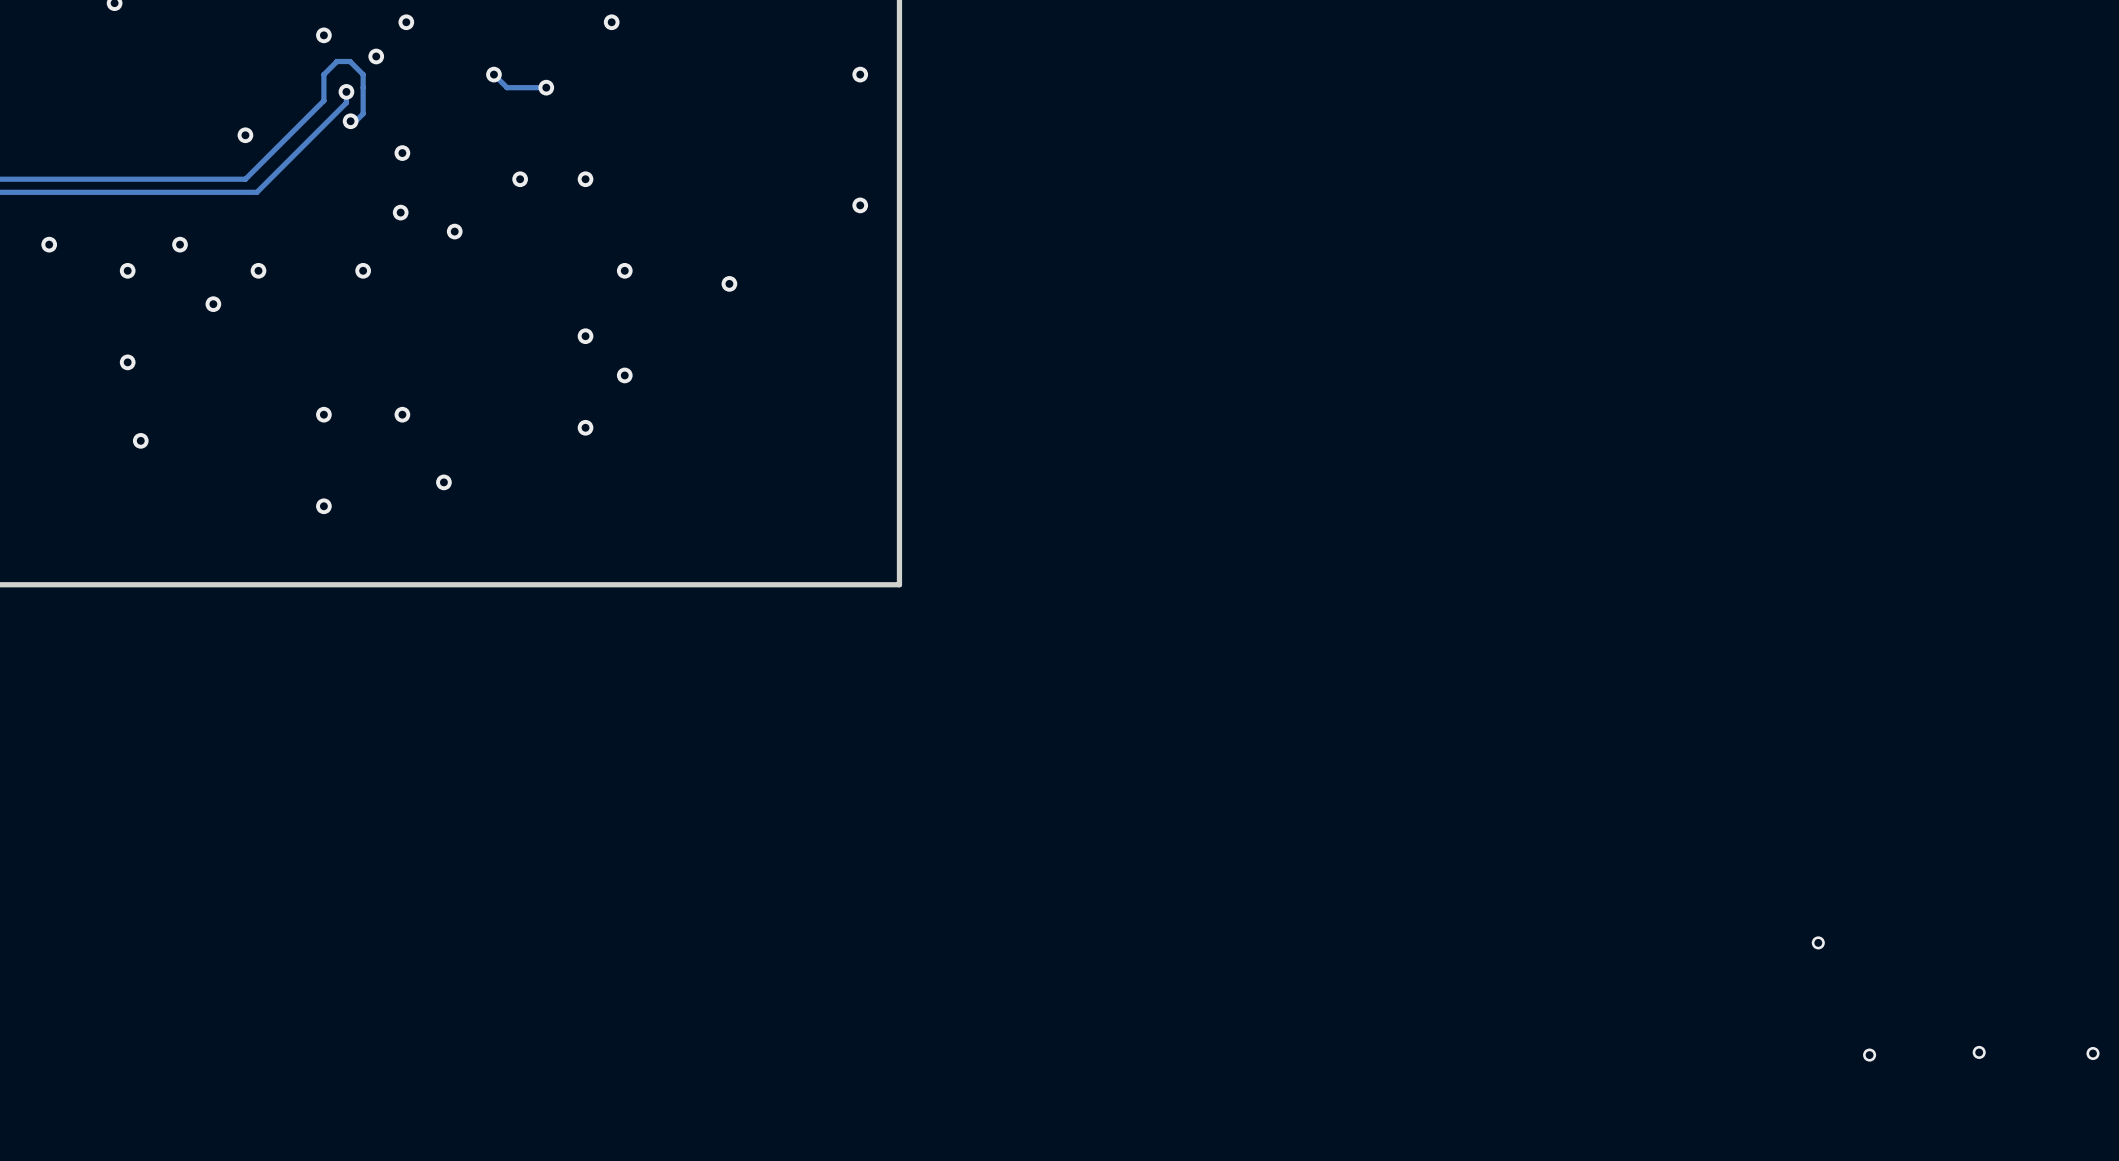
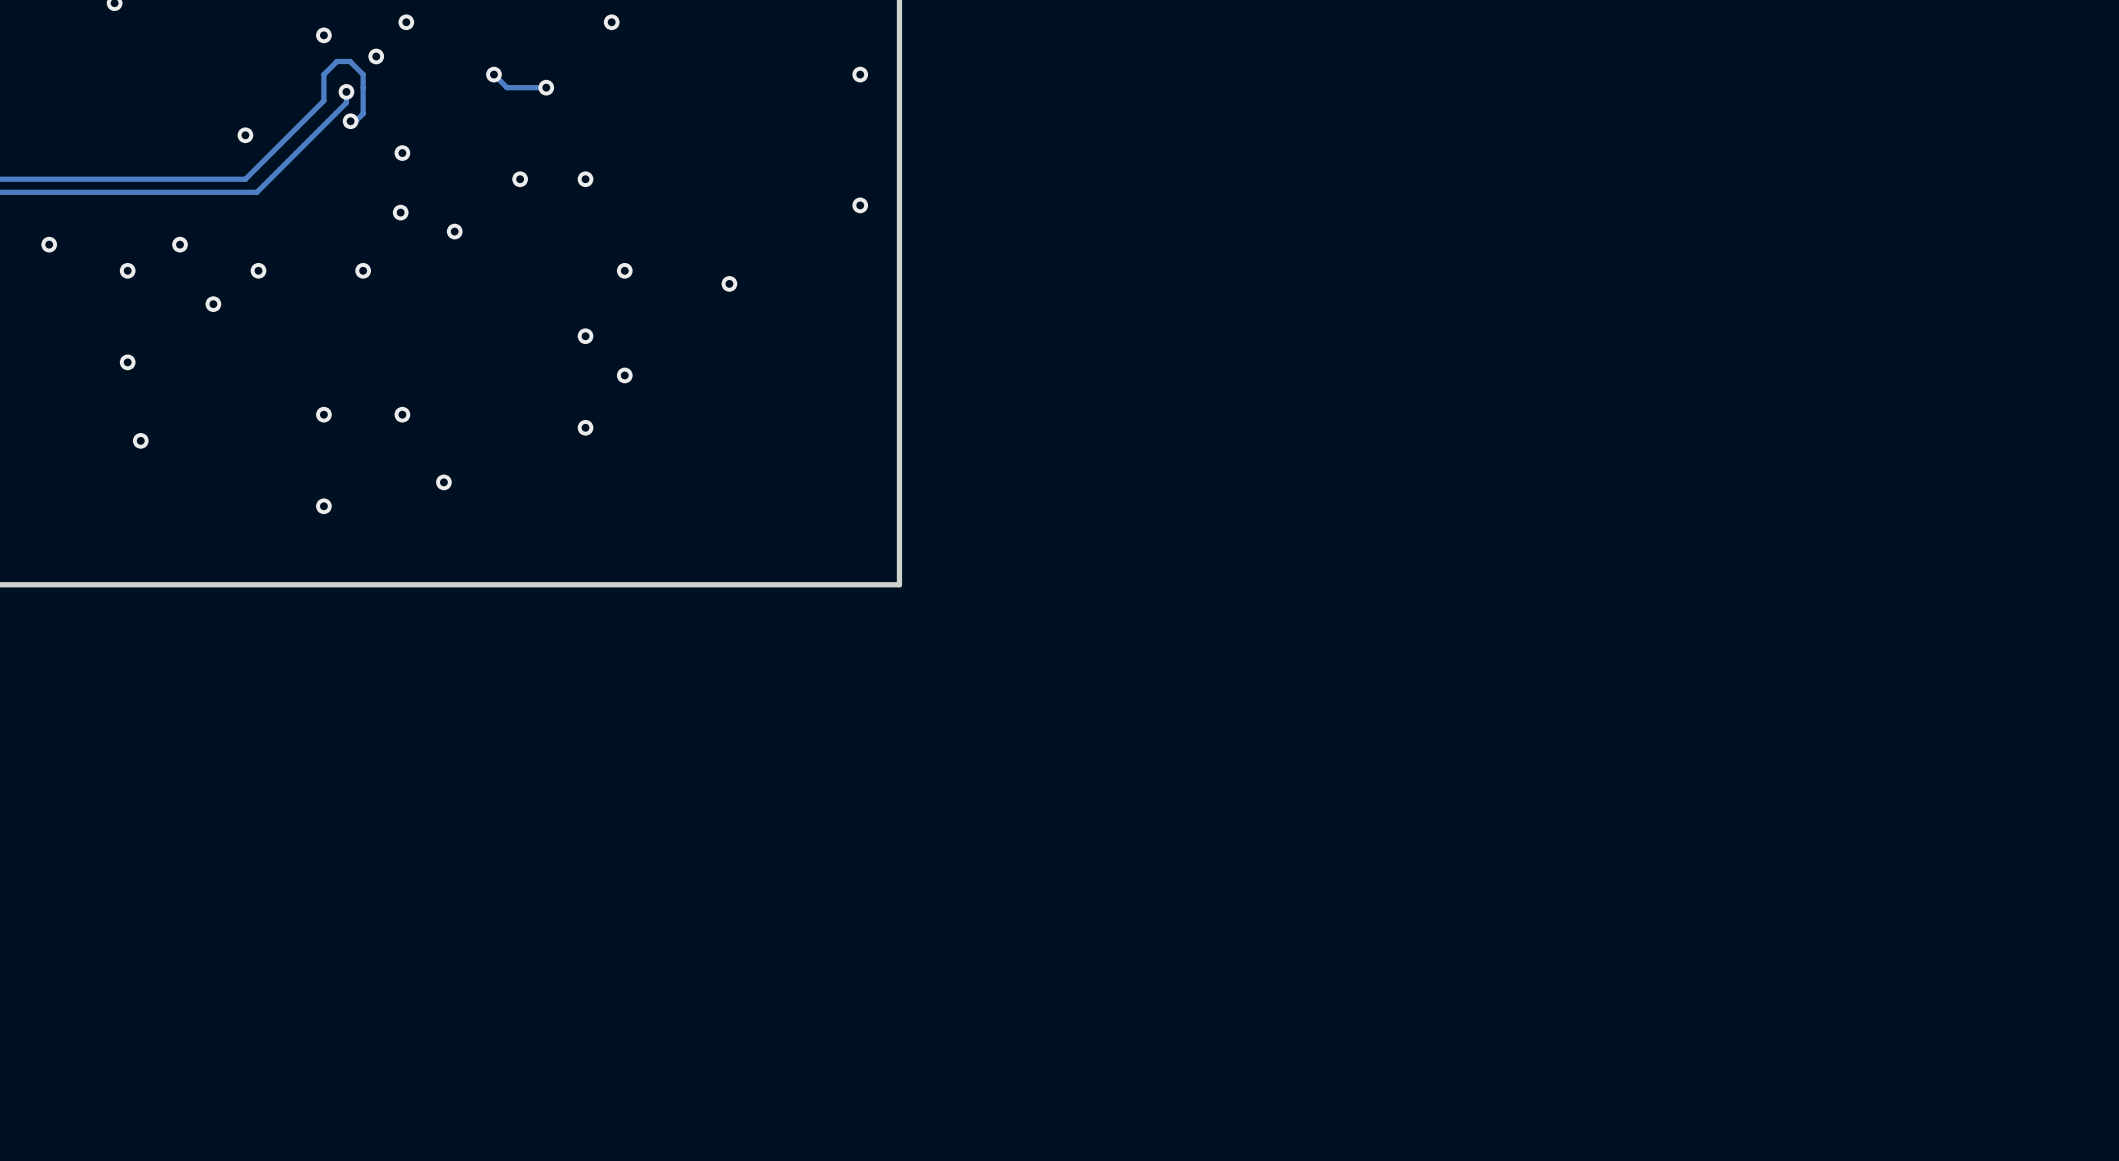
via: (1818, 942) -> none
via: (1979, 1052) -> none
via: (2093, 1053) -> none
via: (1869, 1055) -> none

